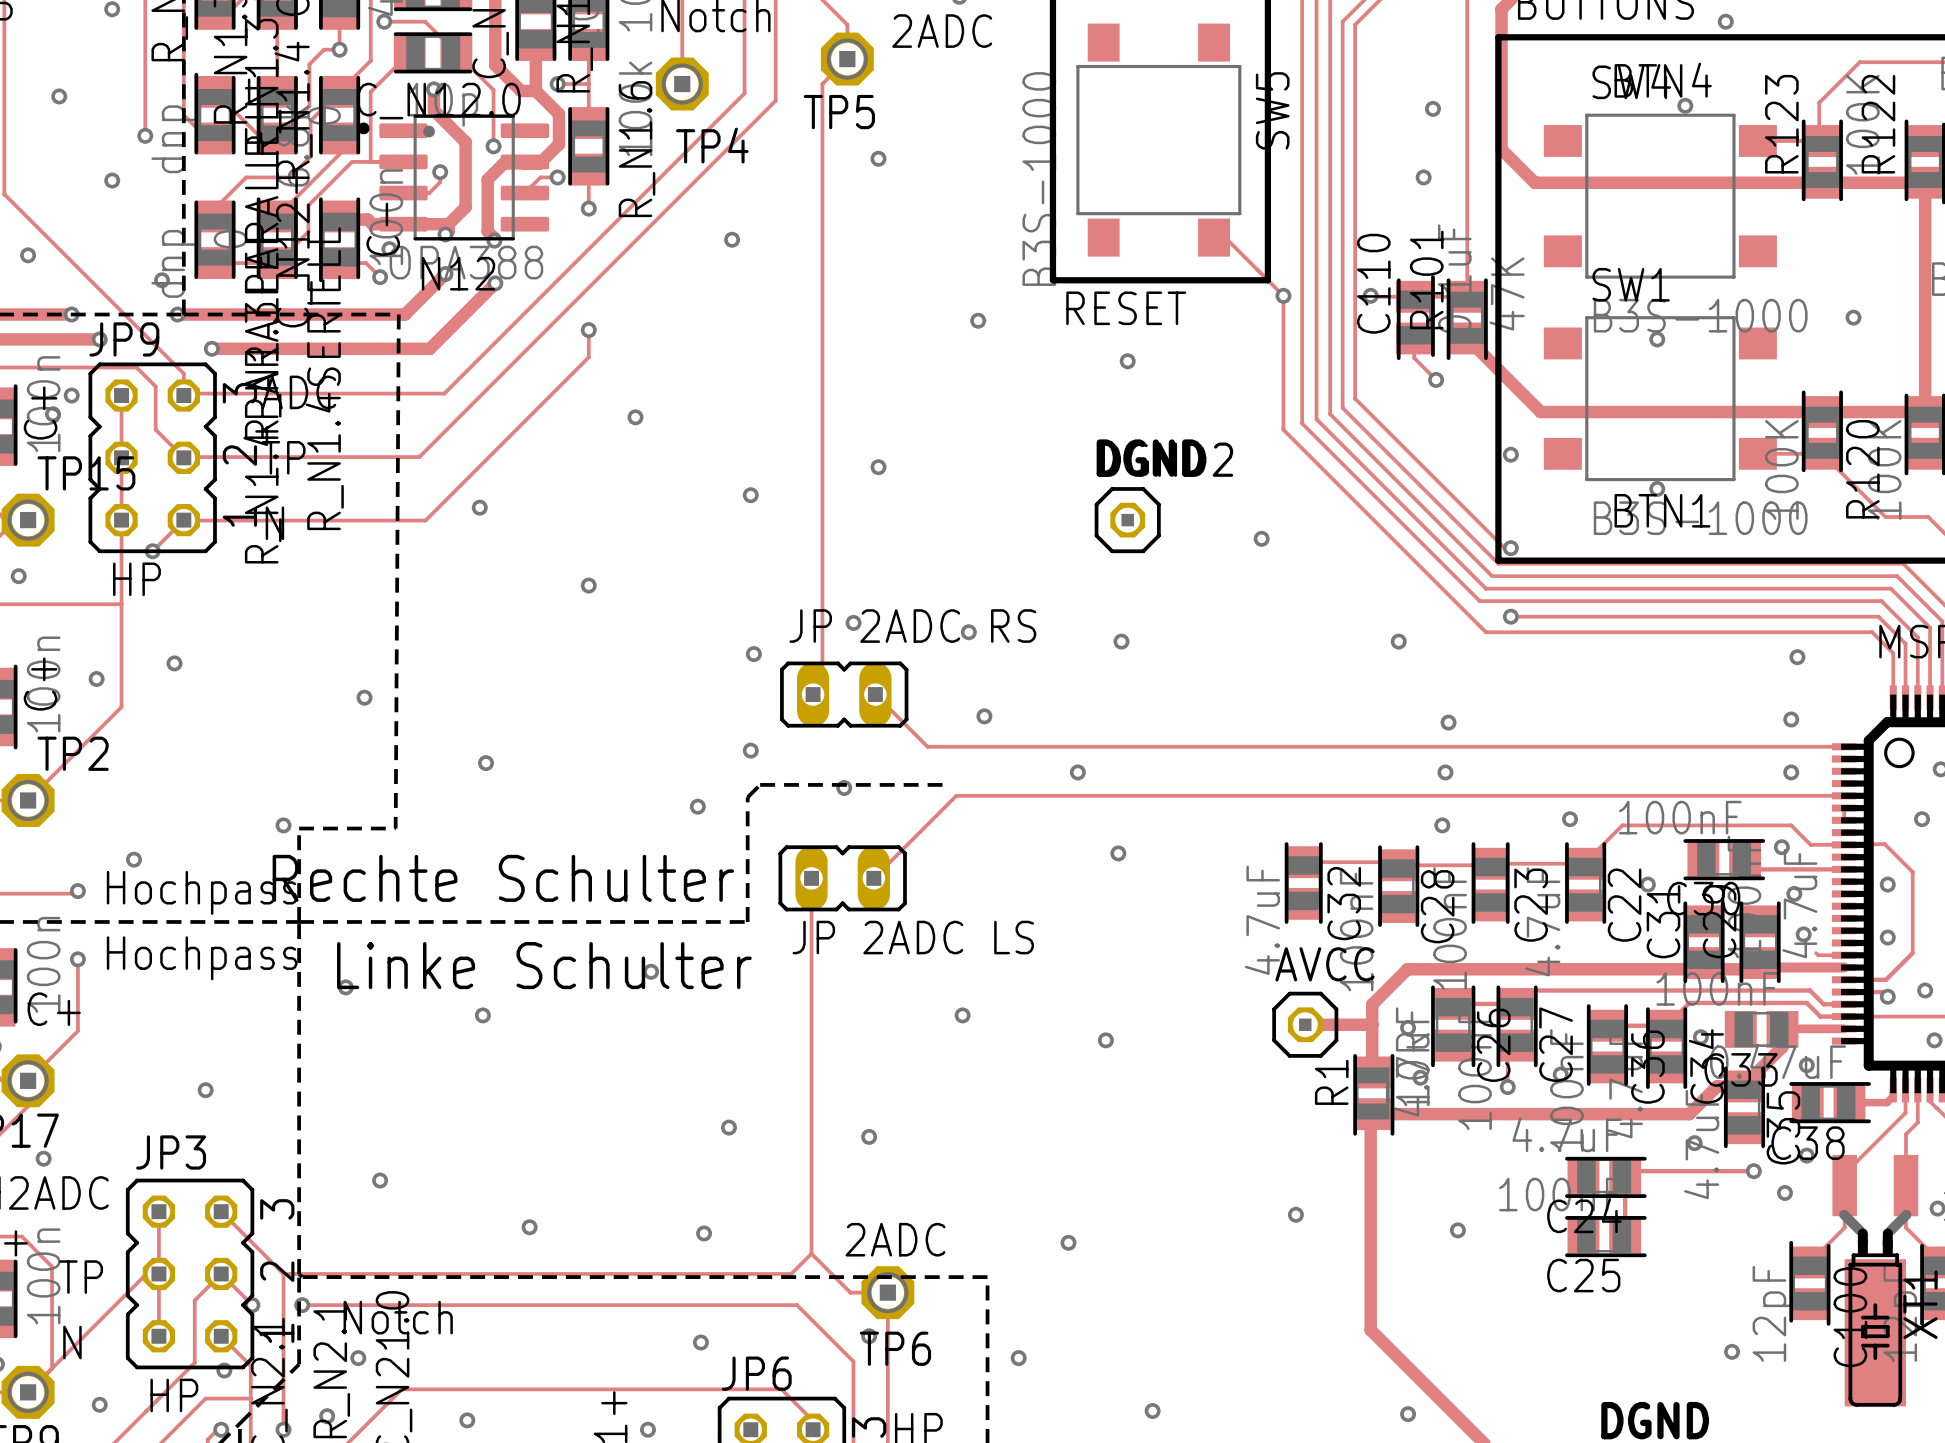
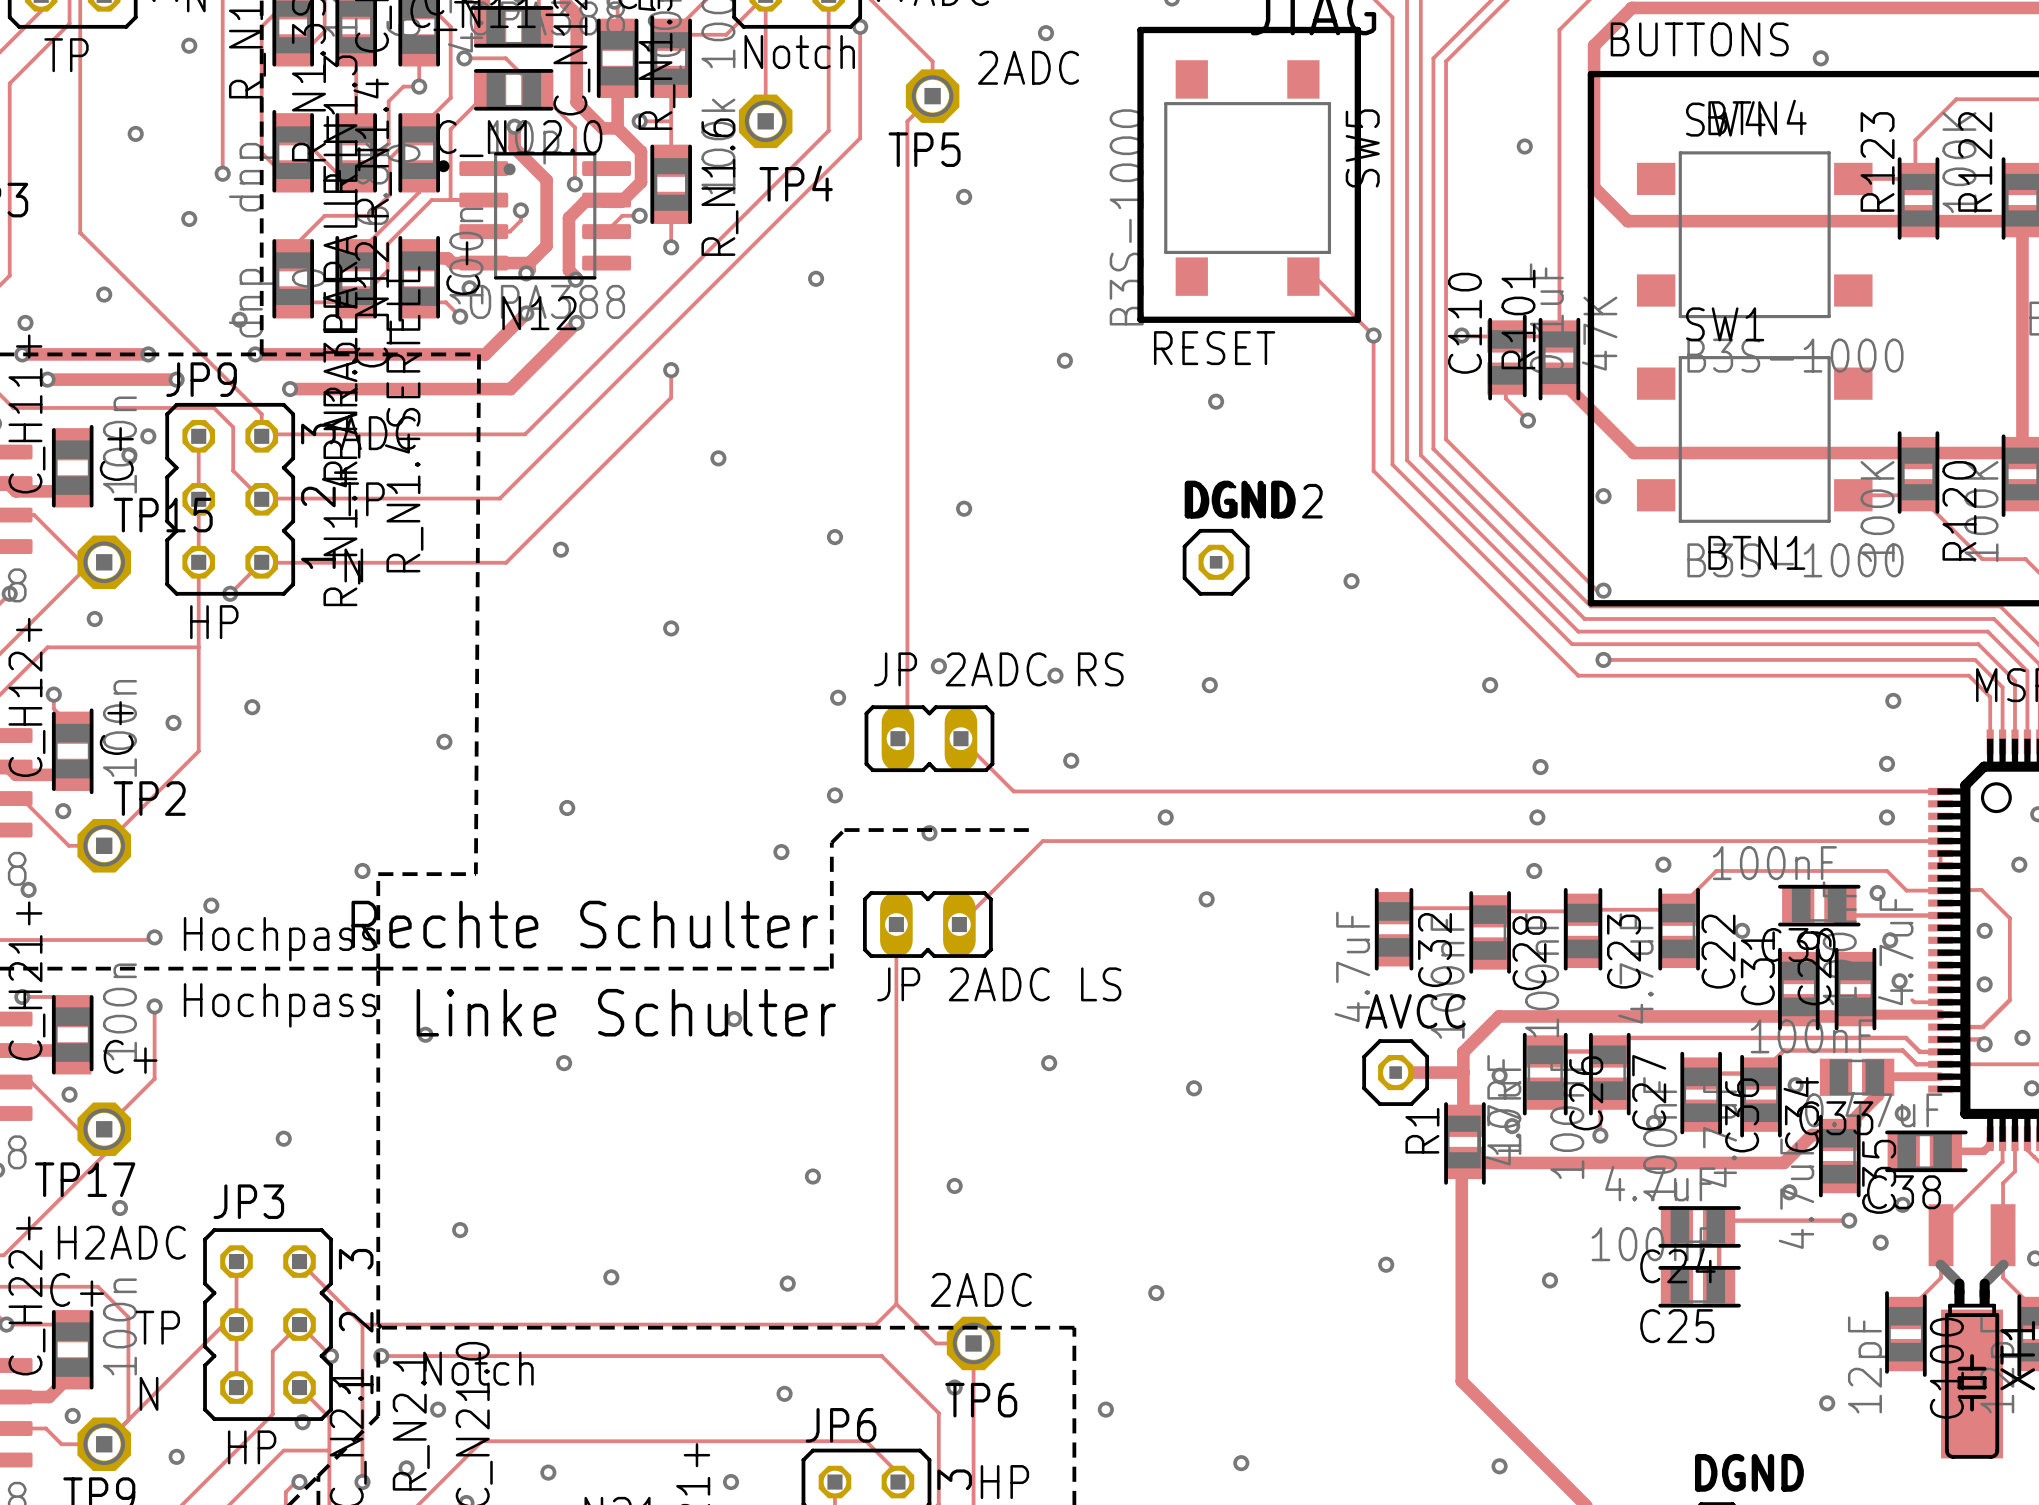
via: (1685, 105) -> none
via: (1423, 177) -> none
via: (1853, 317) -> none
via: (1657, 339) -> none
via: (1657, 488) -> none

